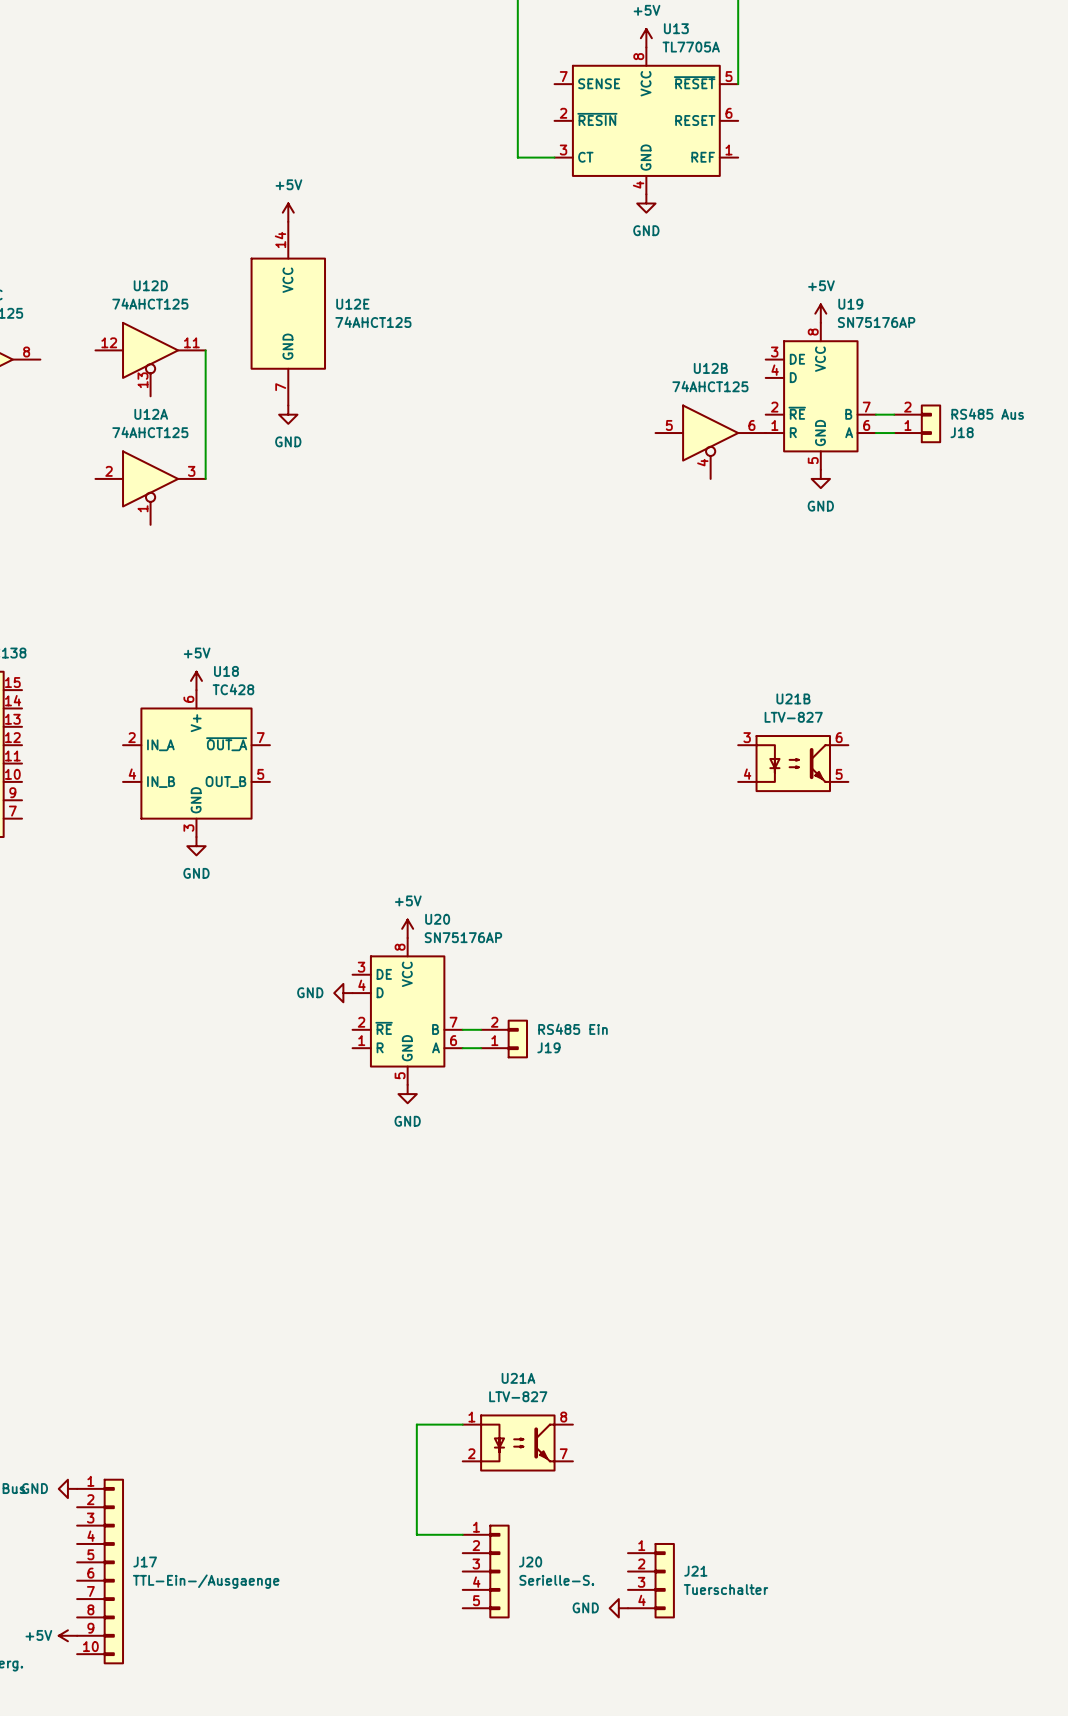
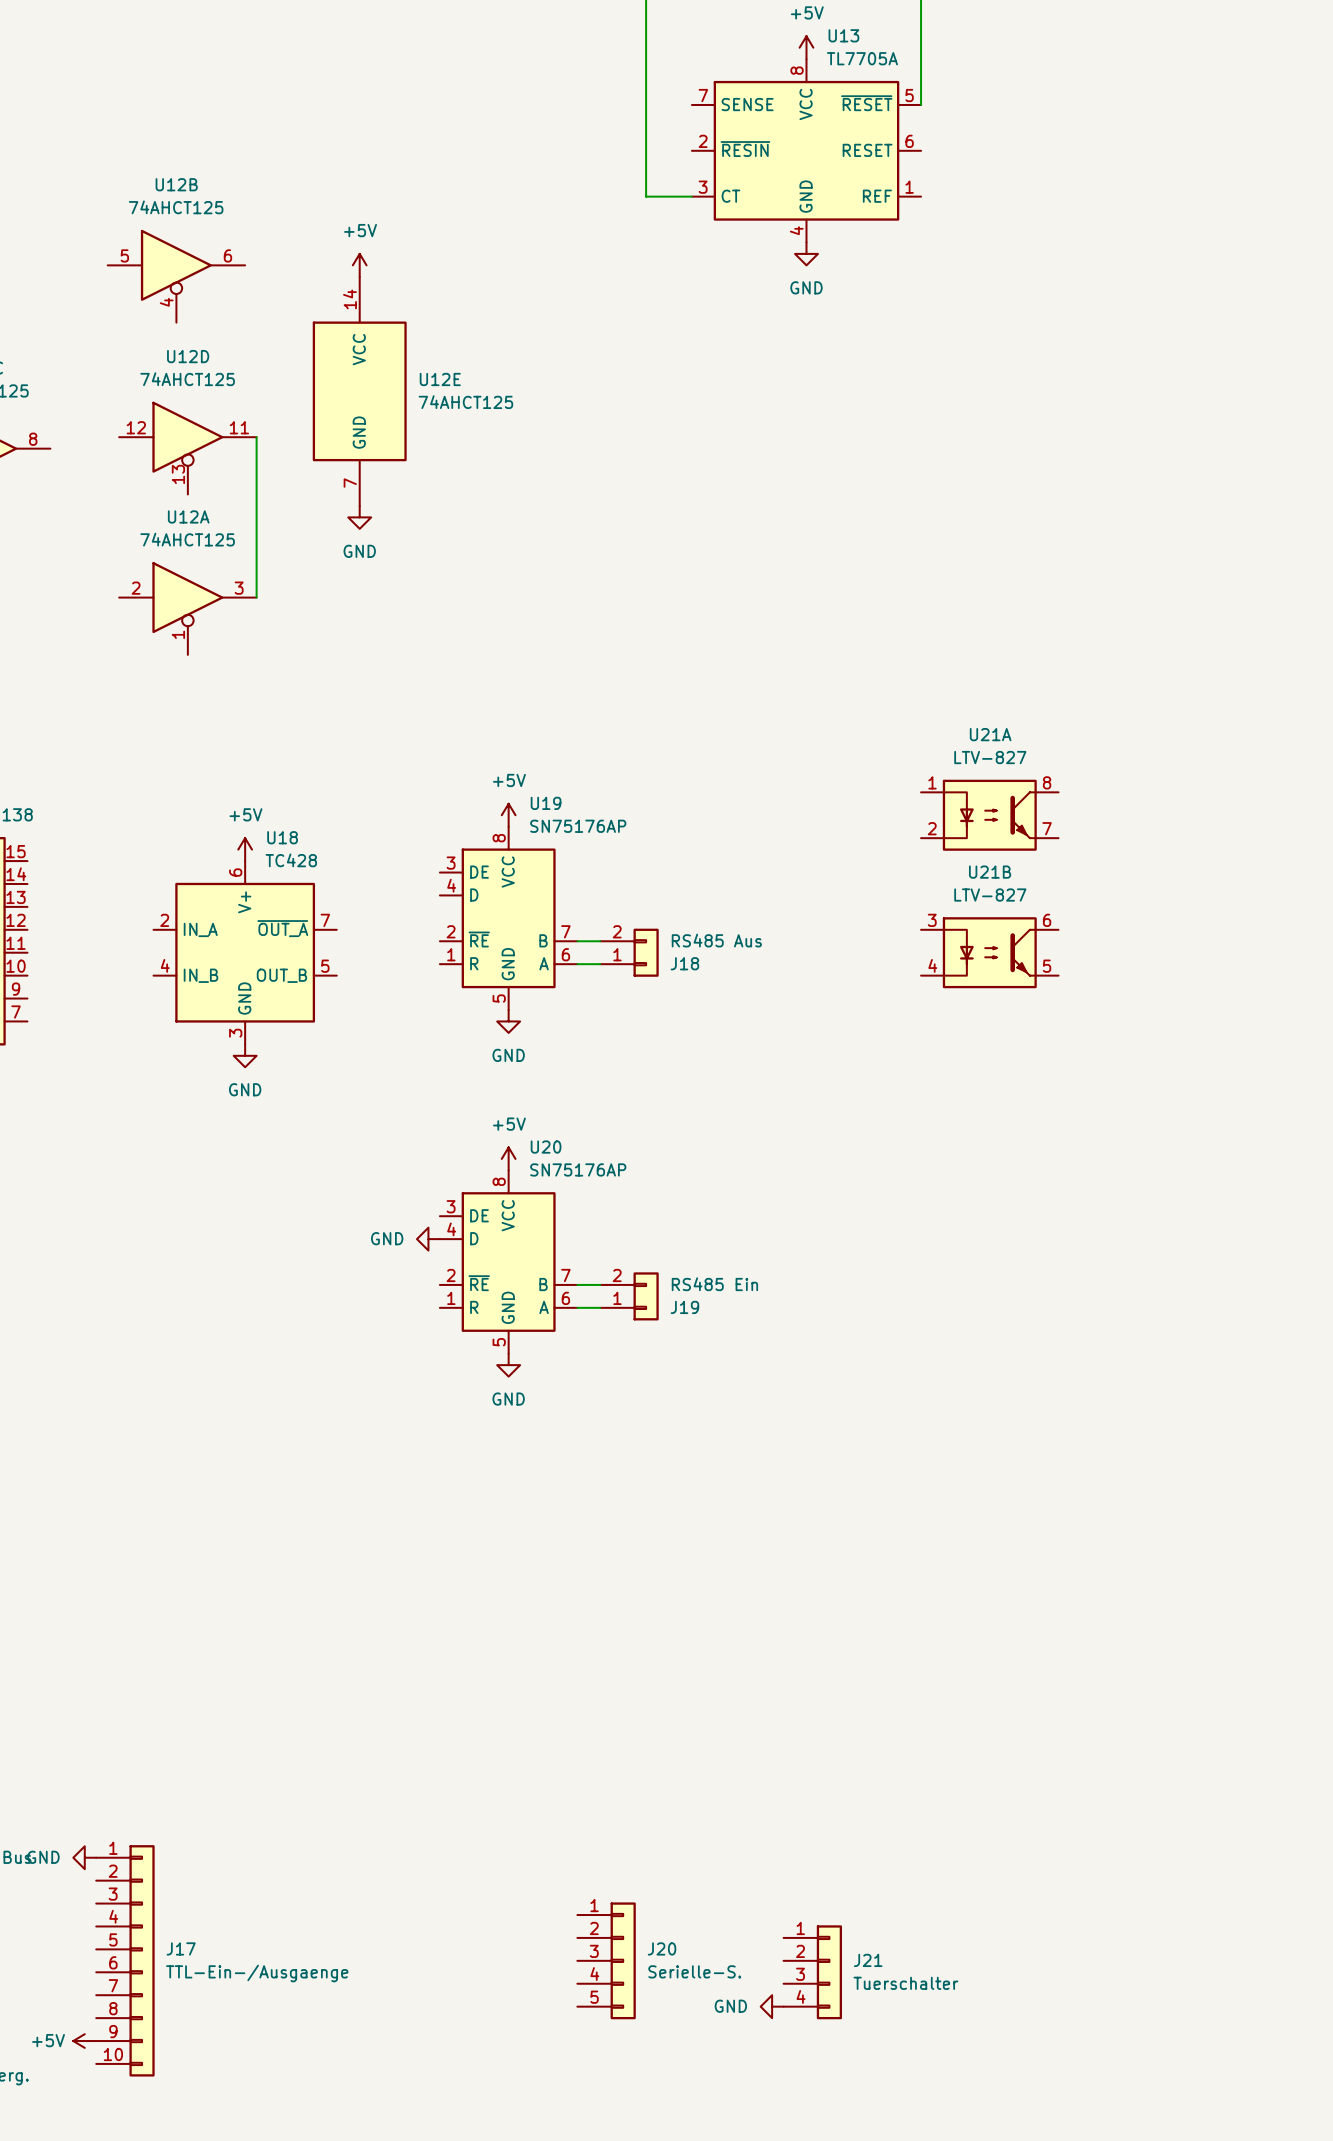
power symbol: +5V (820, 313) -> none
U19 position: (820, 396) -> (508, 918)
wire: (875, 414) (894, 414) -> none
J18 position: (917, 423) -> (629, 952)
wire: (875, 433) (894, 433) -> none
U12B position: (710, 441) -> (176, 276)
power symbol: GND (820, 478) -> none
power symbol: none -> +5V (508, 815)
wire: none -> (577, 941) (600, 941)
wire: none -> (577, 964) (600, 964)
power symbol: none -> GND (508, 1021)
wire: (462, 1424) (416, 1424) (416, 1534) (462, 1534) -> none
U21A position: (517, 1442) -> (989, 815)

